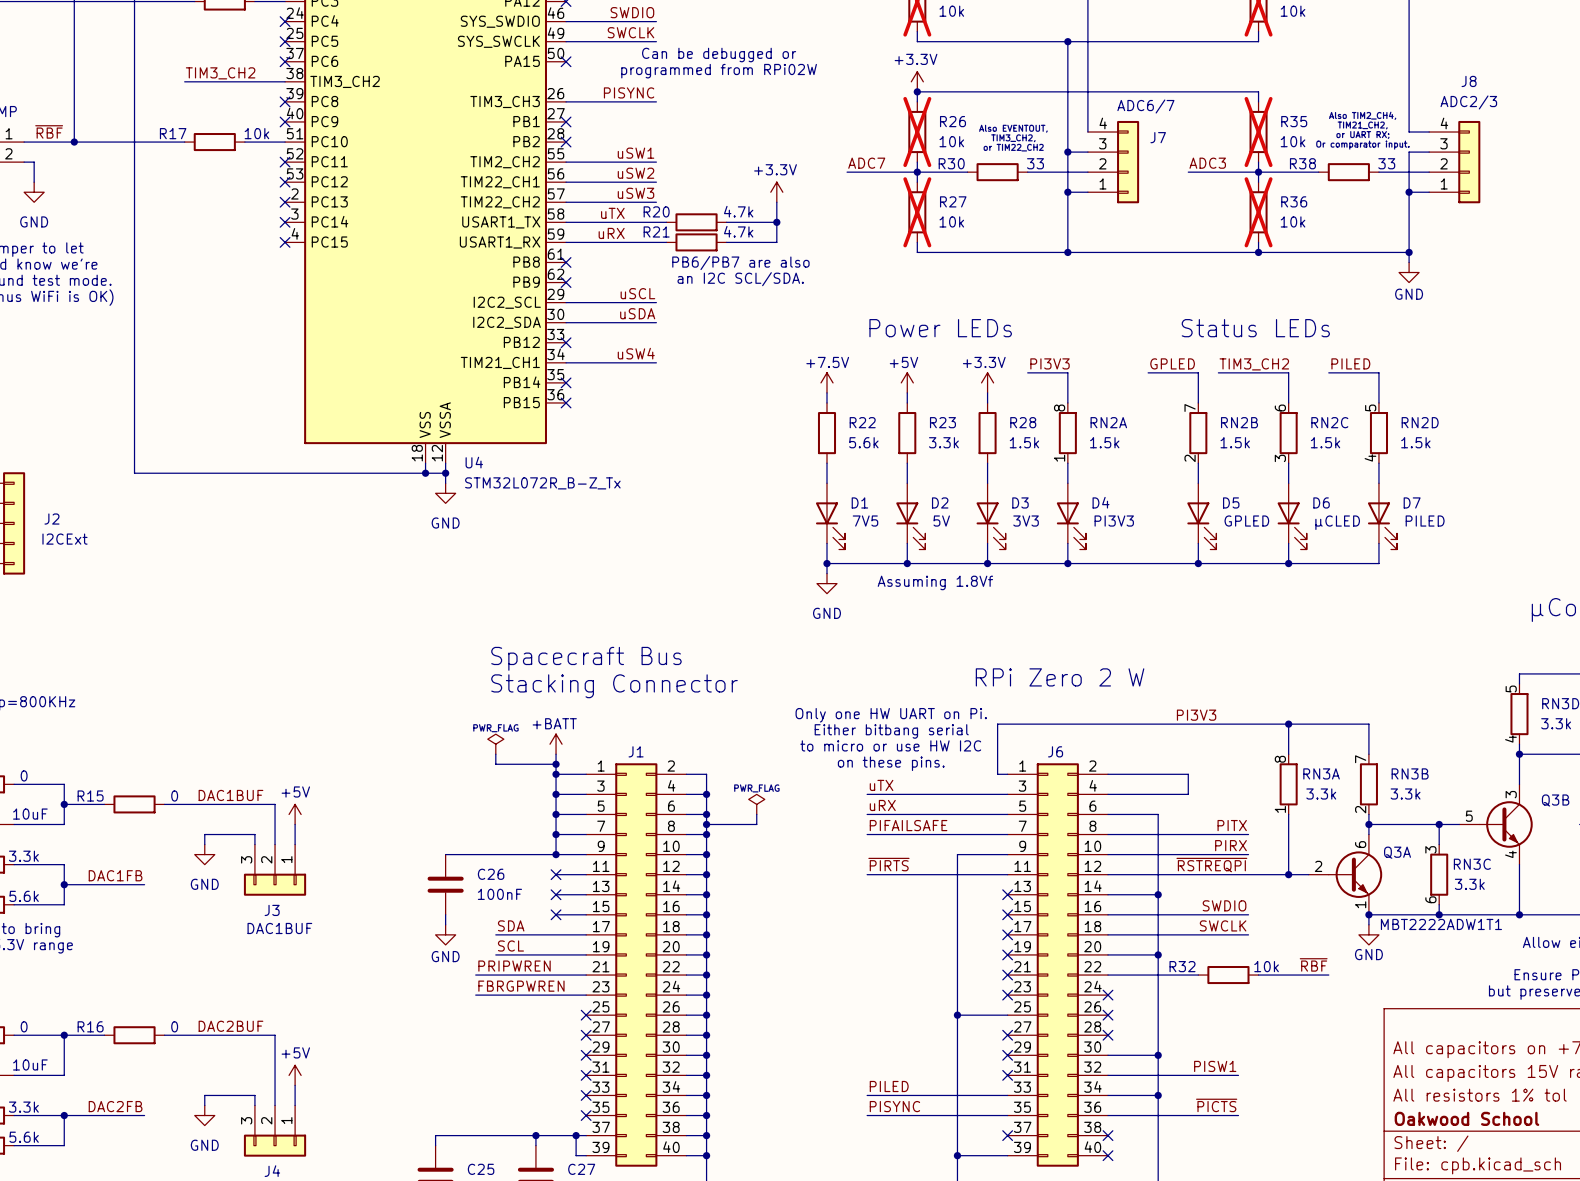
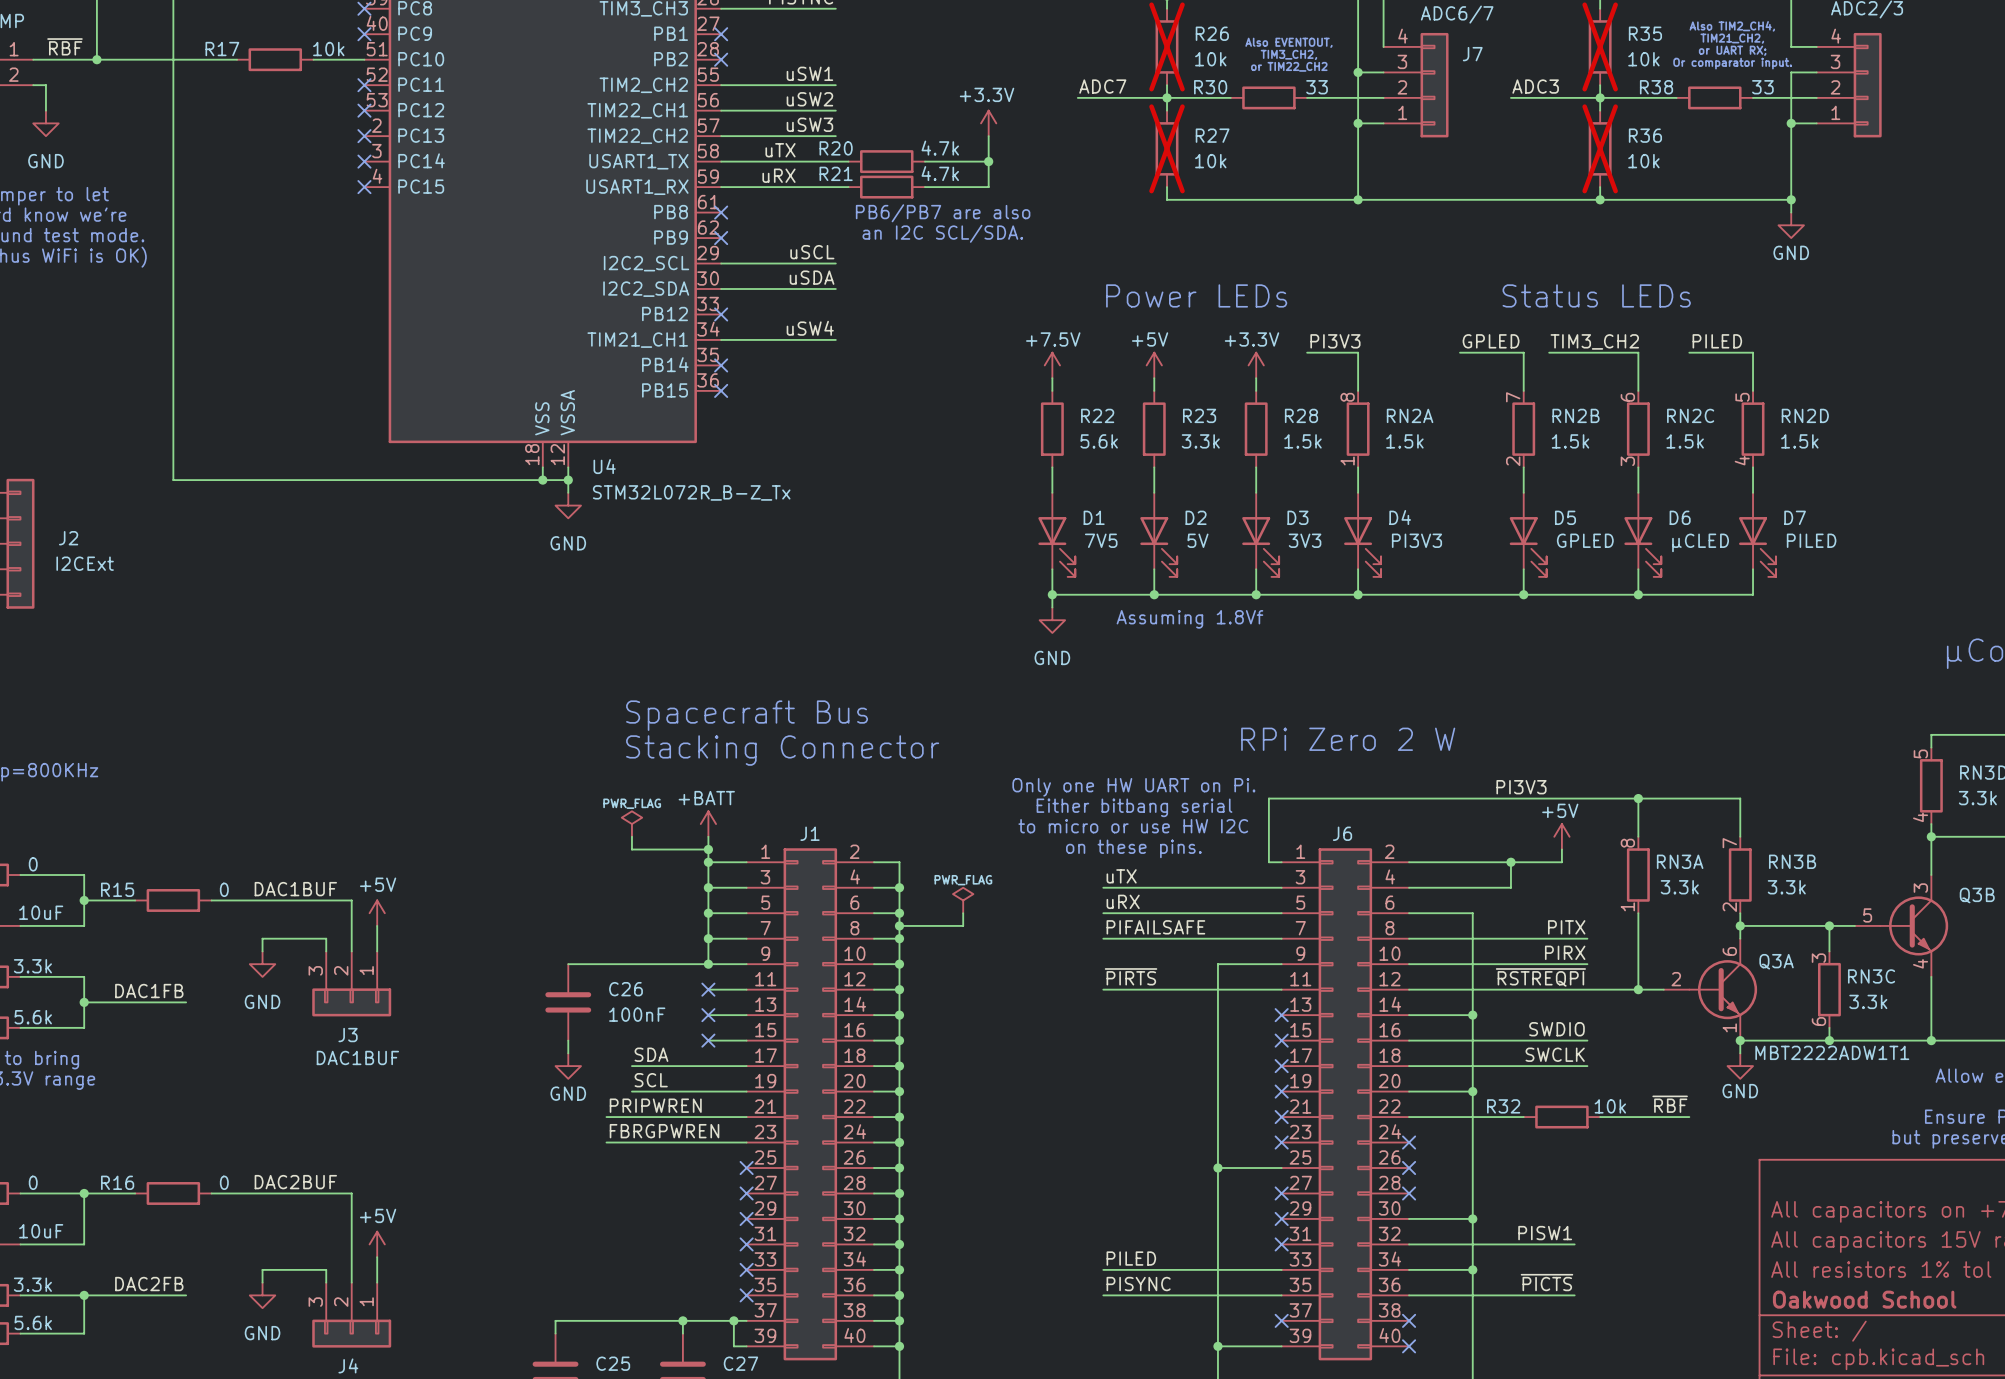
power symbol: none -> +5V (1561, 836)
wire: none -> (1561, 849) (1561, 862) (1510, 862)
junction: none -> (1510, 862)

